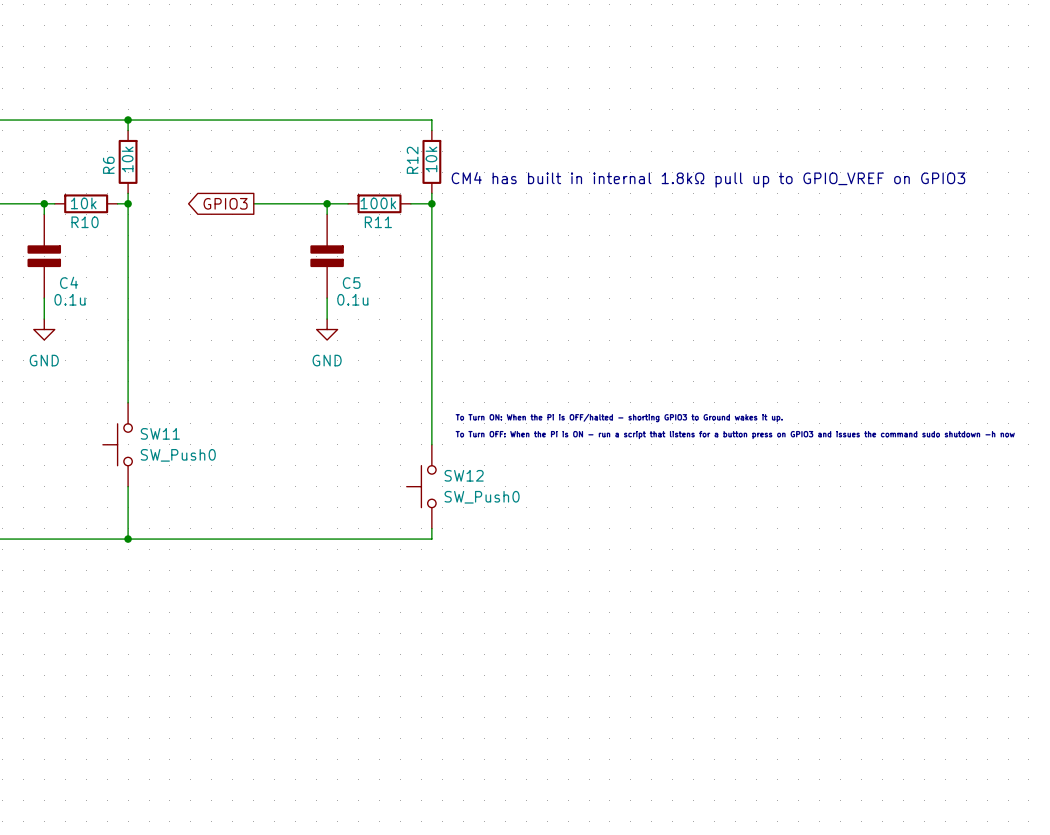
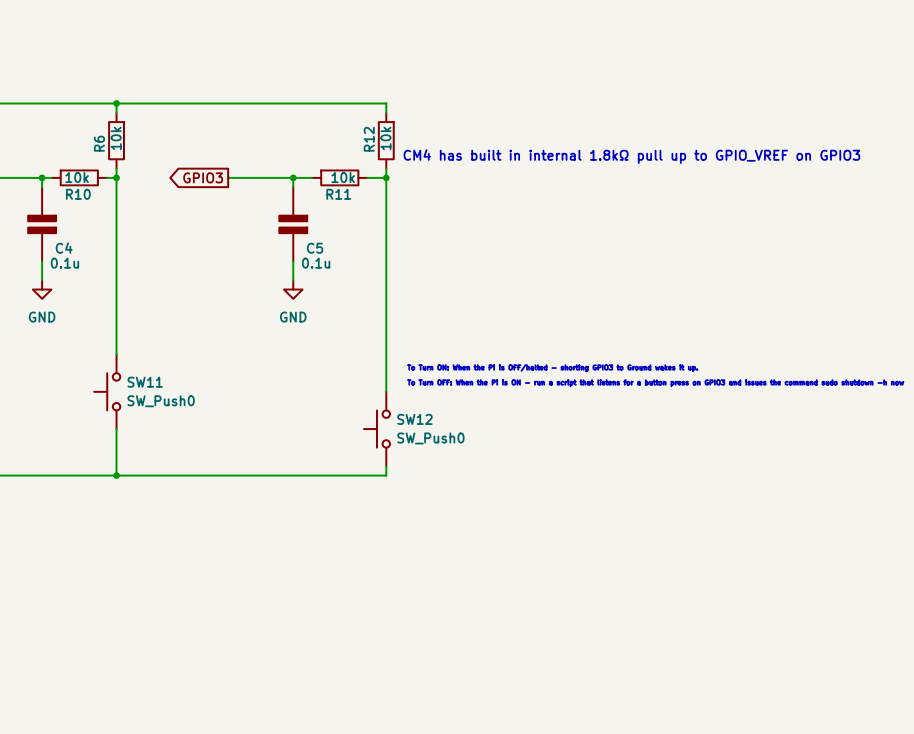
R11 value: 100k (378, 203) -> 10k (343, 177)

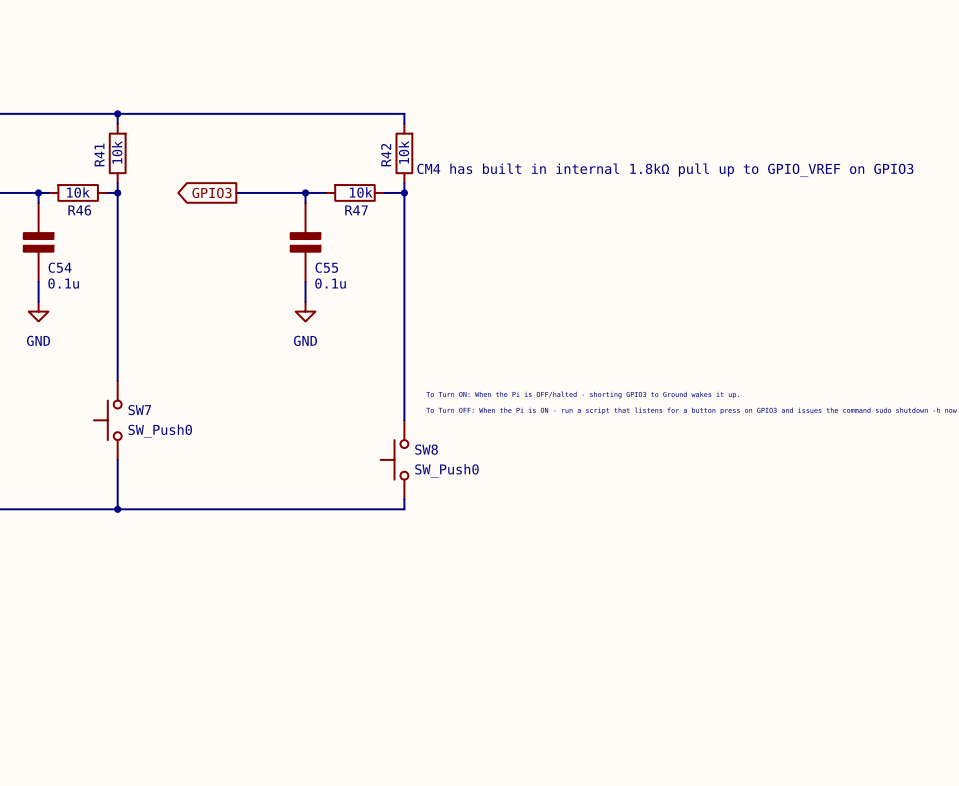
R12 name: R12 (369, 139) -> R42 (386, 155)
R6 name: R6 (99, 143) -> R41 (99, 154)
R10 name: R10 (78, 194) -> R46 (79, 210)
R11 name: R11 (338, 194) -> R47 (356, 210)
C4 name: C4 (64, 248) -> C54 (60, 267)
C5 name: C5 (315, 248) -> C55 (326, 267)
SW11 name: SW11 (145, 382) -> SW7 (139, 410)
SW12 name: SW12 (414, 419) -> SW8 (426, 449)

